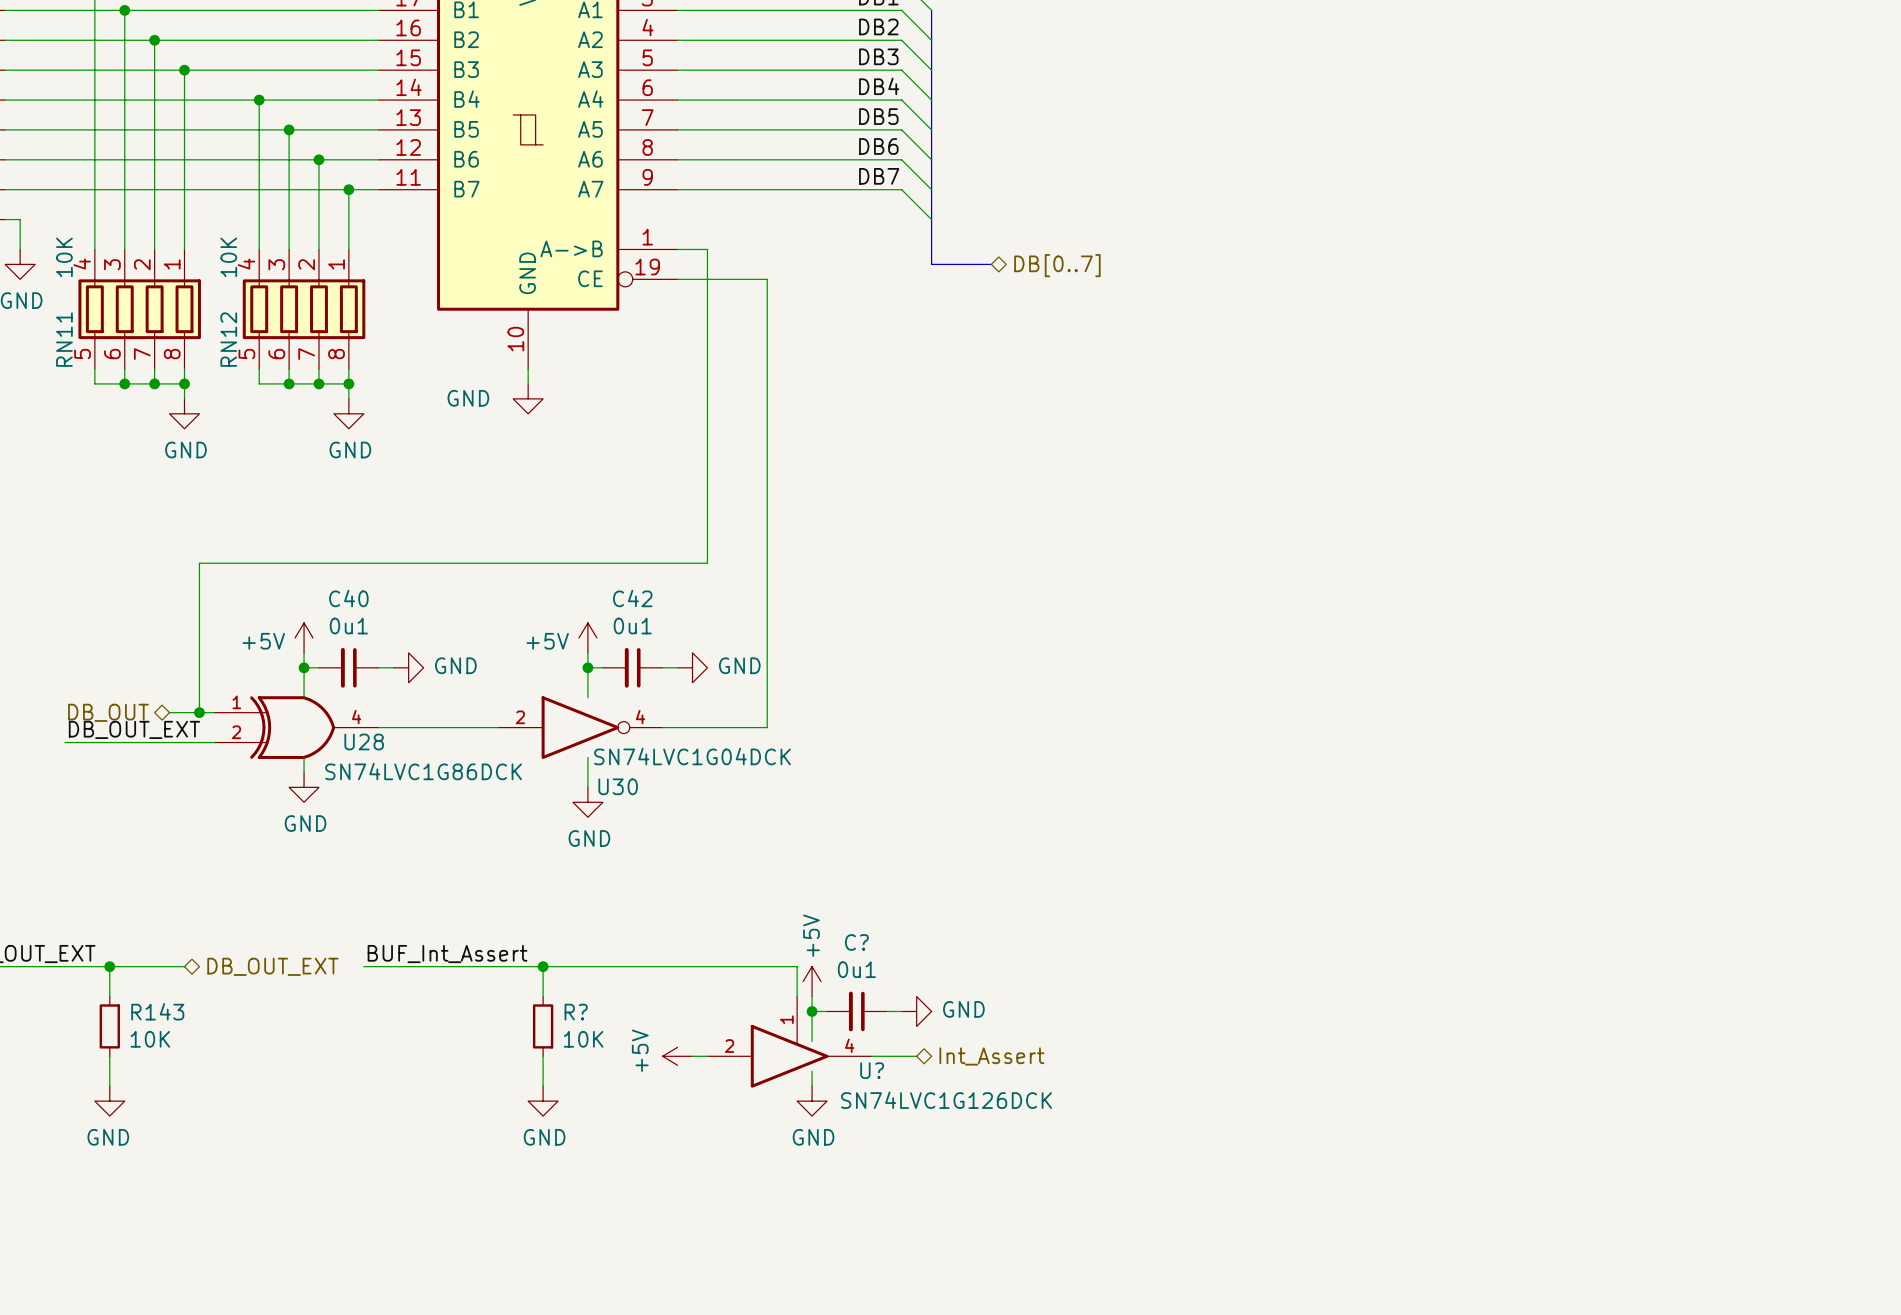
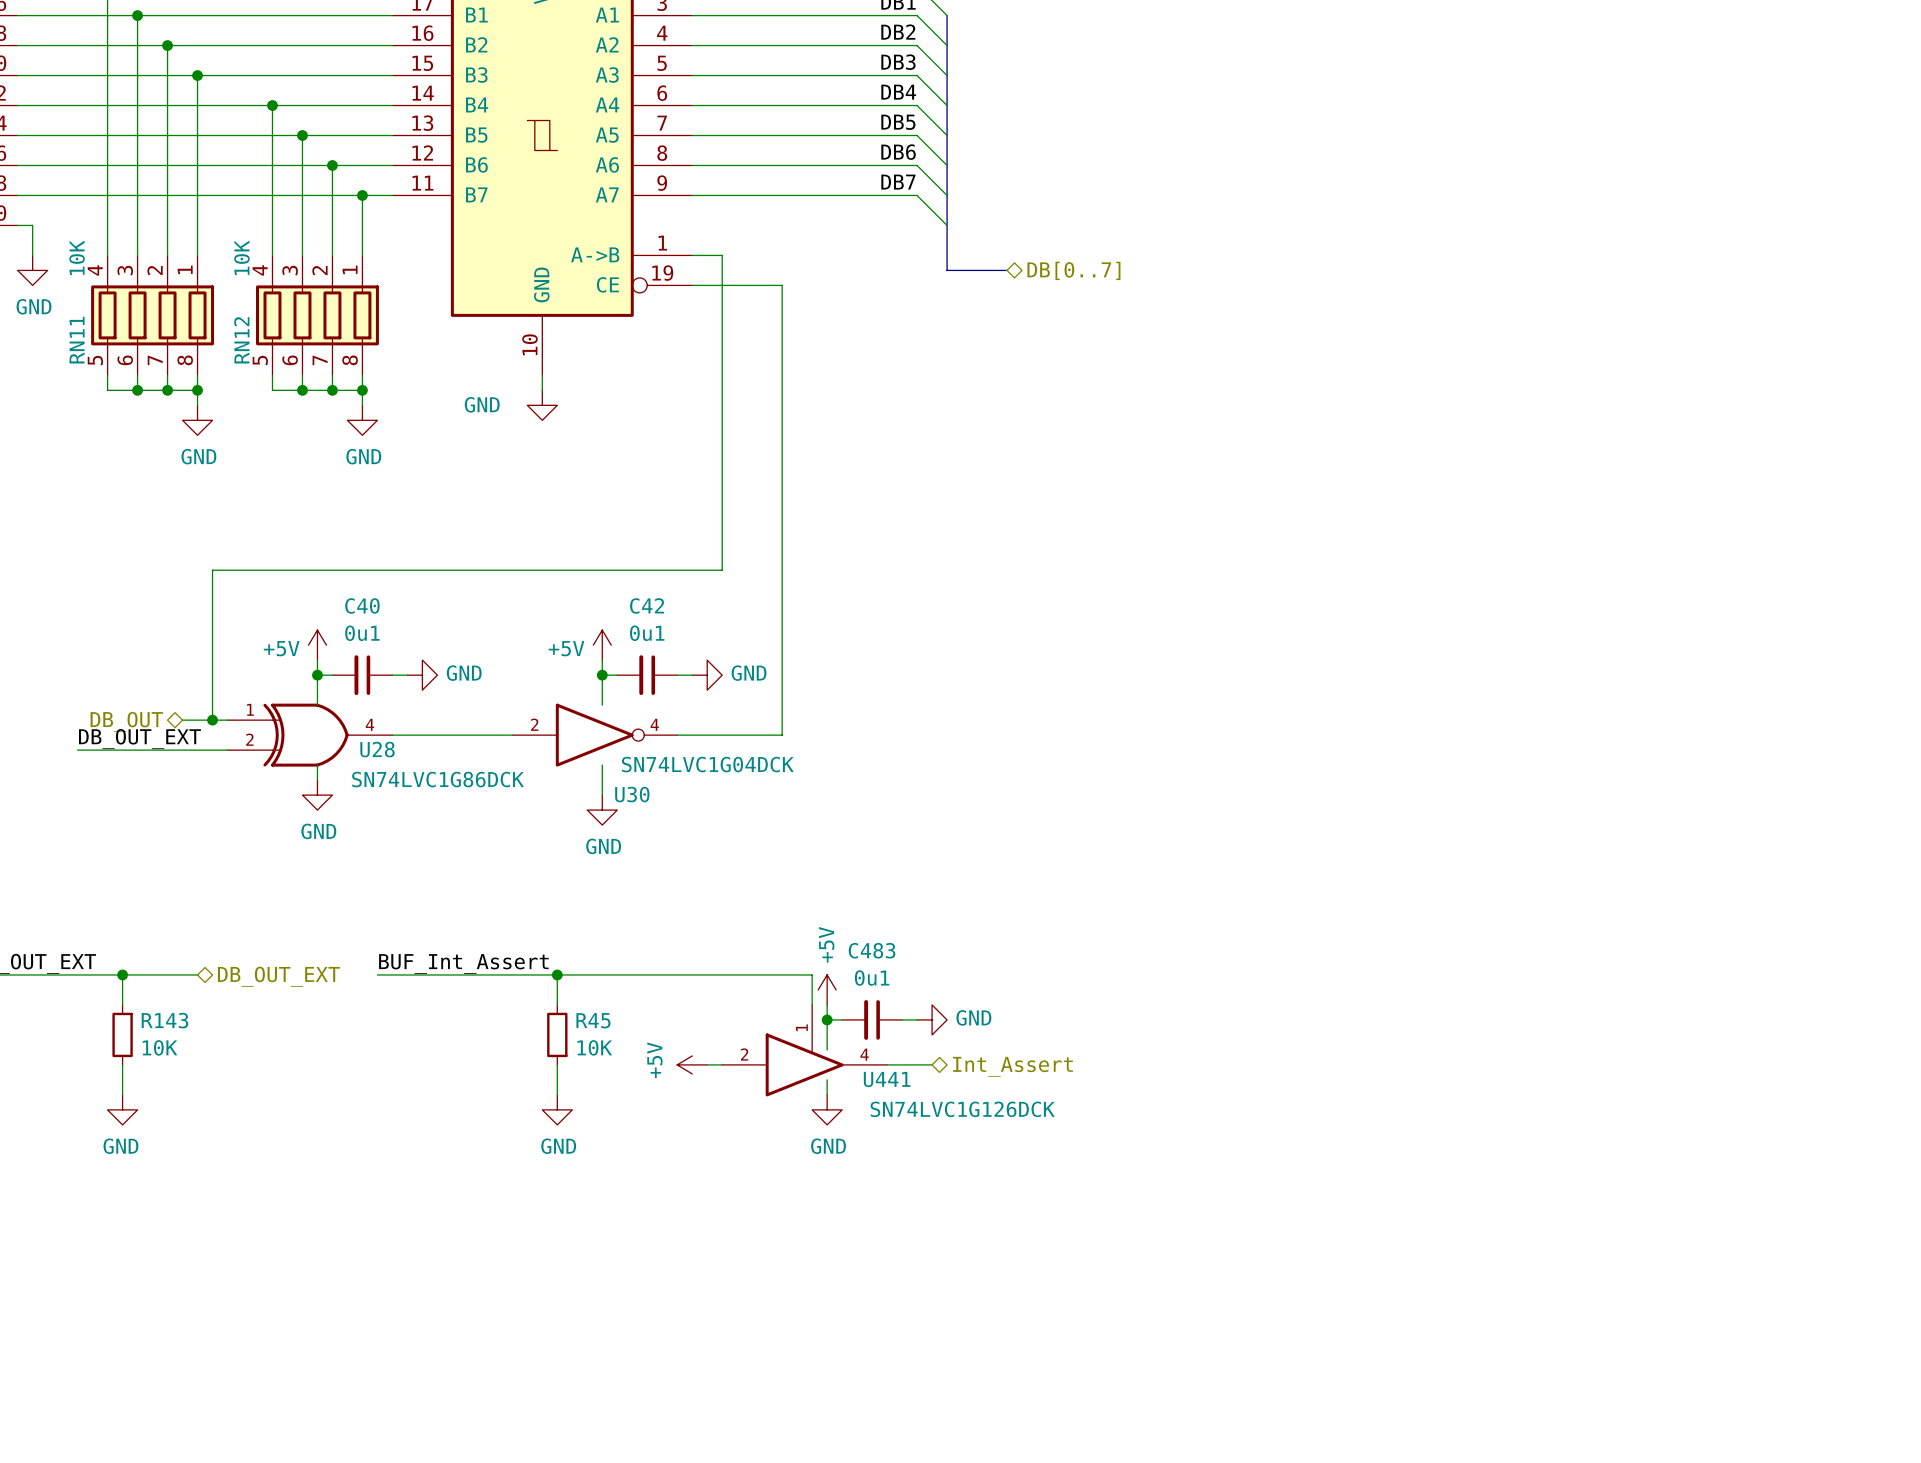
C? name: C? (856, 942) -> C483 (872, 950)
R? name: R? (576, 1012) -> R45 (593, 1020)
U? name: U? (872, 1070) -> U441 (887, 1079)

